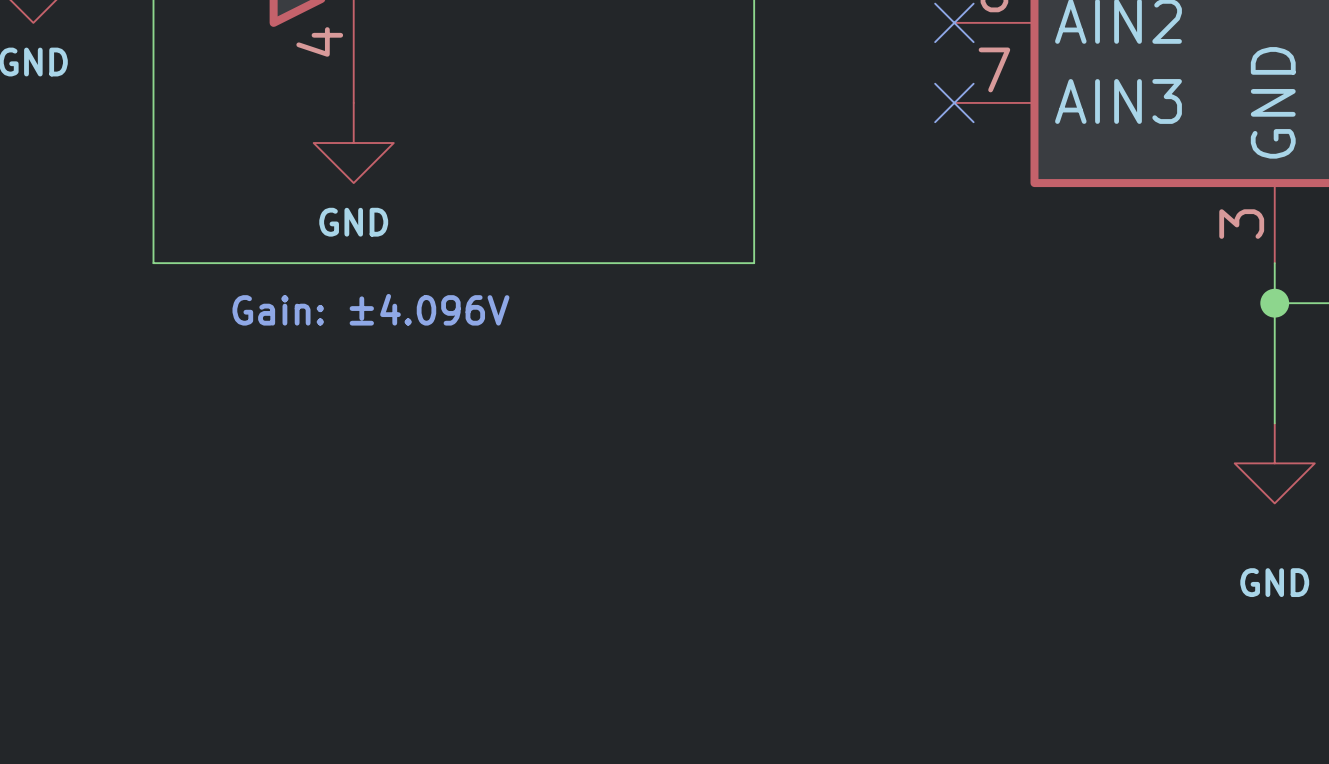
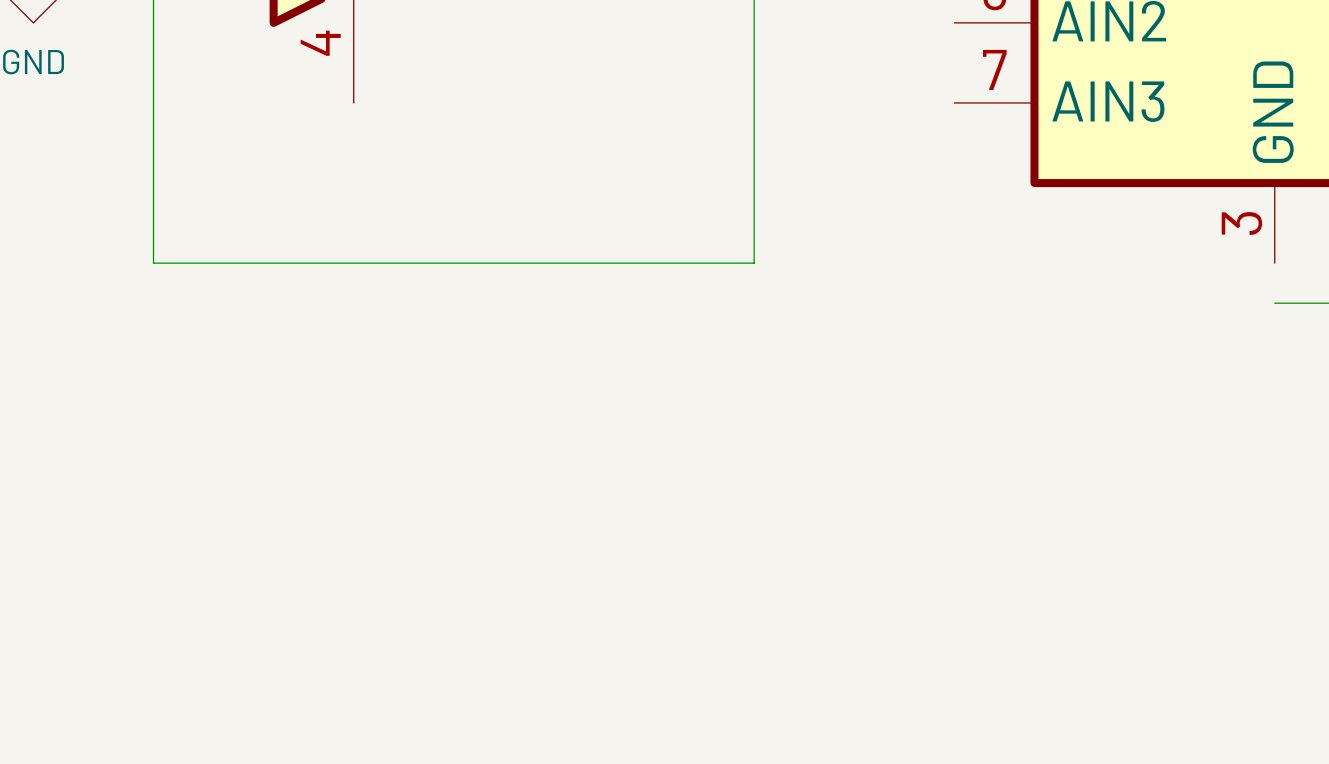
no-connect mark: (954, 22) -> none
no-connect mark: (954, 102) -> none
power symbol: GND (353, 143) -> none
wire: (1274, 263) (1274, 423) -> none
junction: (1274, 303) -> none
text: Gain: ±4.096V (370, 309) -> none
power symbol: GND (1274, 463) -> none

